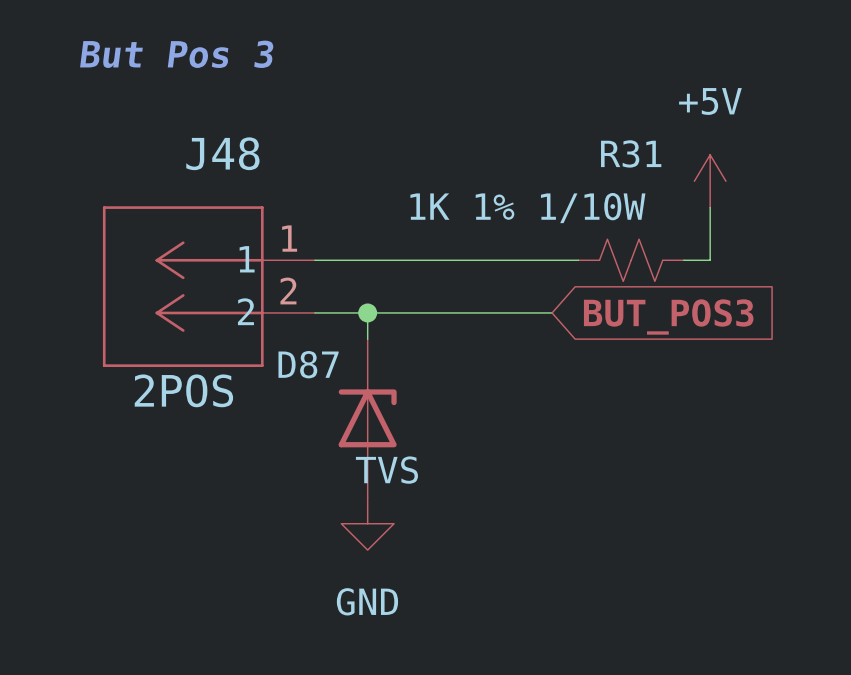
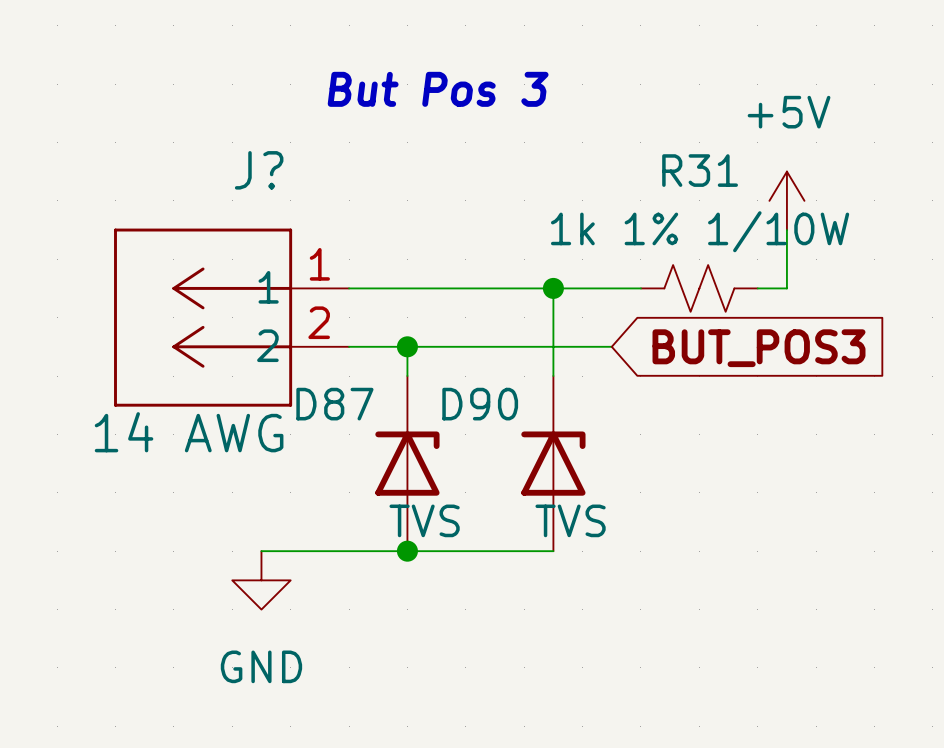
text position: But Pos 3 (176, 54) -> But Pos 3 (438, 89)
J48 name: J48 (222, 153) -> J? (259, 170)
R31 value: 1K 1% 1/10W (527, 208) -> 1k 1% 1/10W (700, 231)
wire: none -> (553, 288) (553, 376)
junction: none -> (553, 288)
J48 value: 2POS (183, 390) -> 14 AWG (189, 432)
D90: none -> TVS (553, 463)
wire: none -> (261, 551) (553, 551)
junction: none -> (407, 551)
power symbol position: GND (367, 523) -> GND (261, 580)

